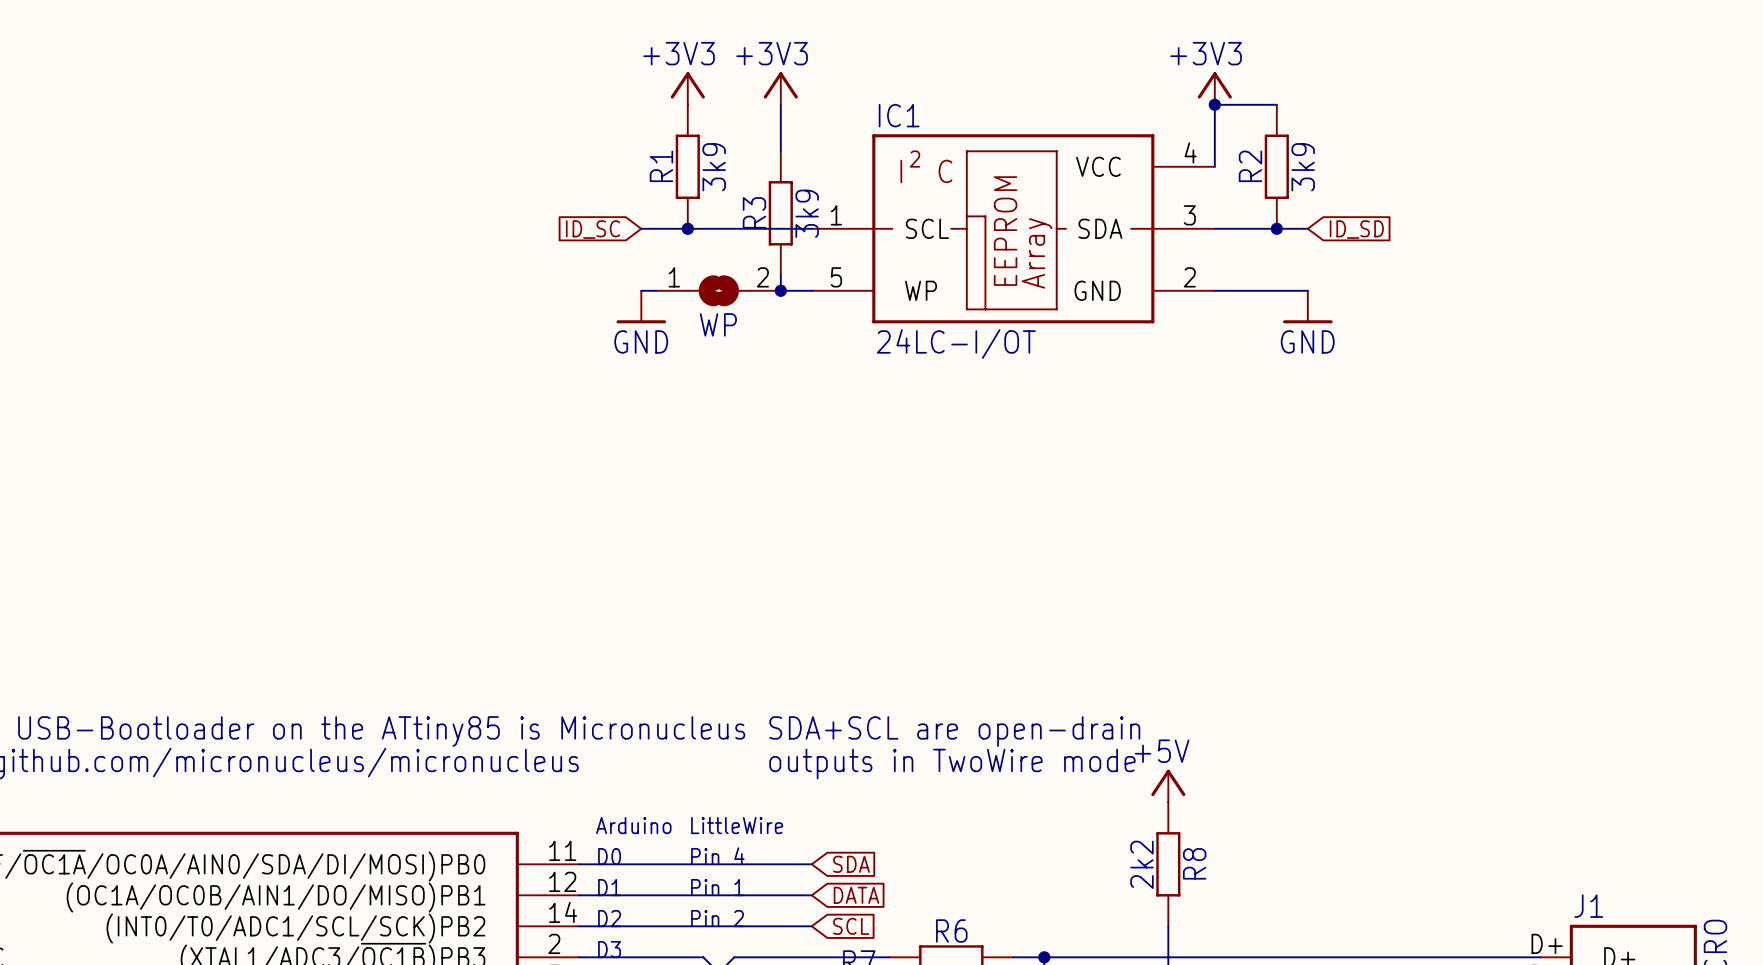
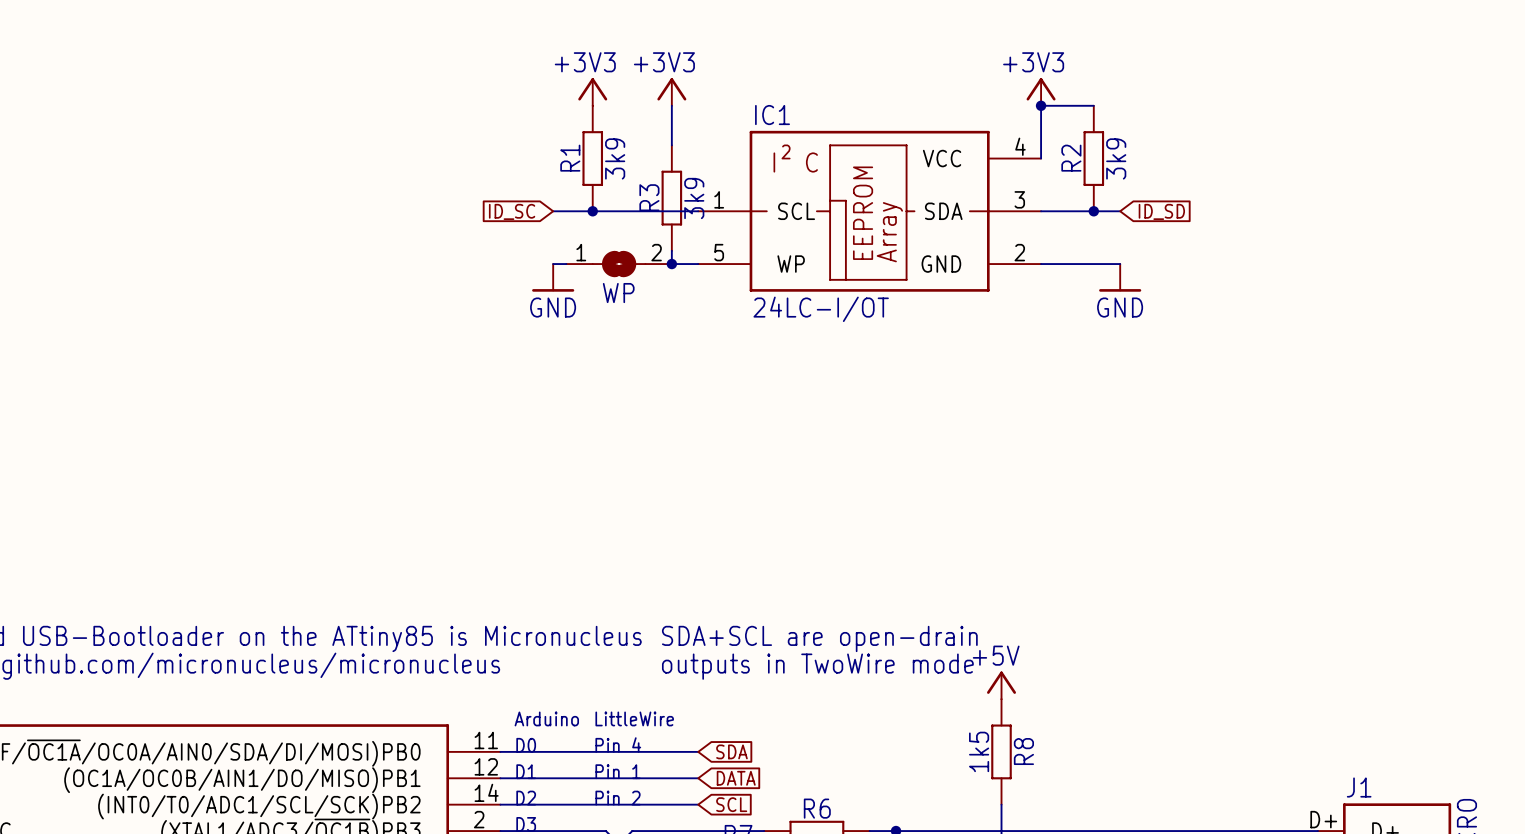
R8 value: 2k2 (1141, 864) -> 1k5 (979, 751)

